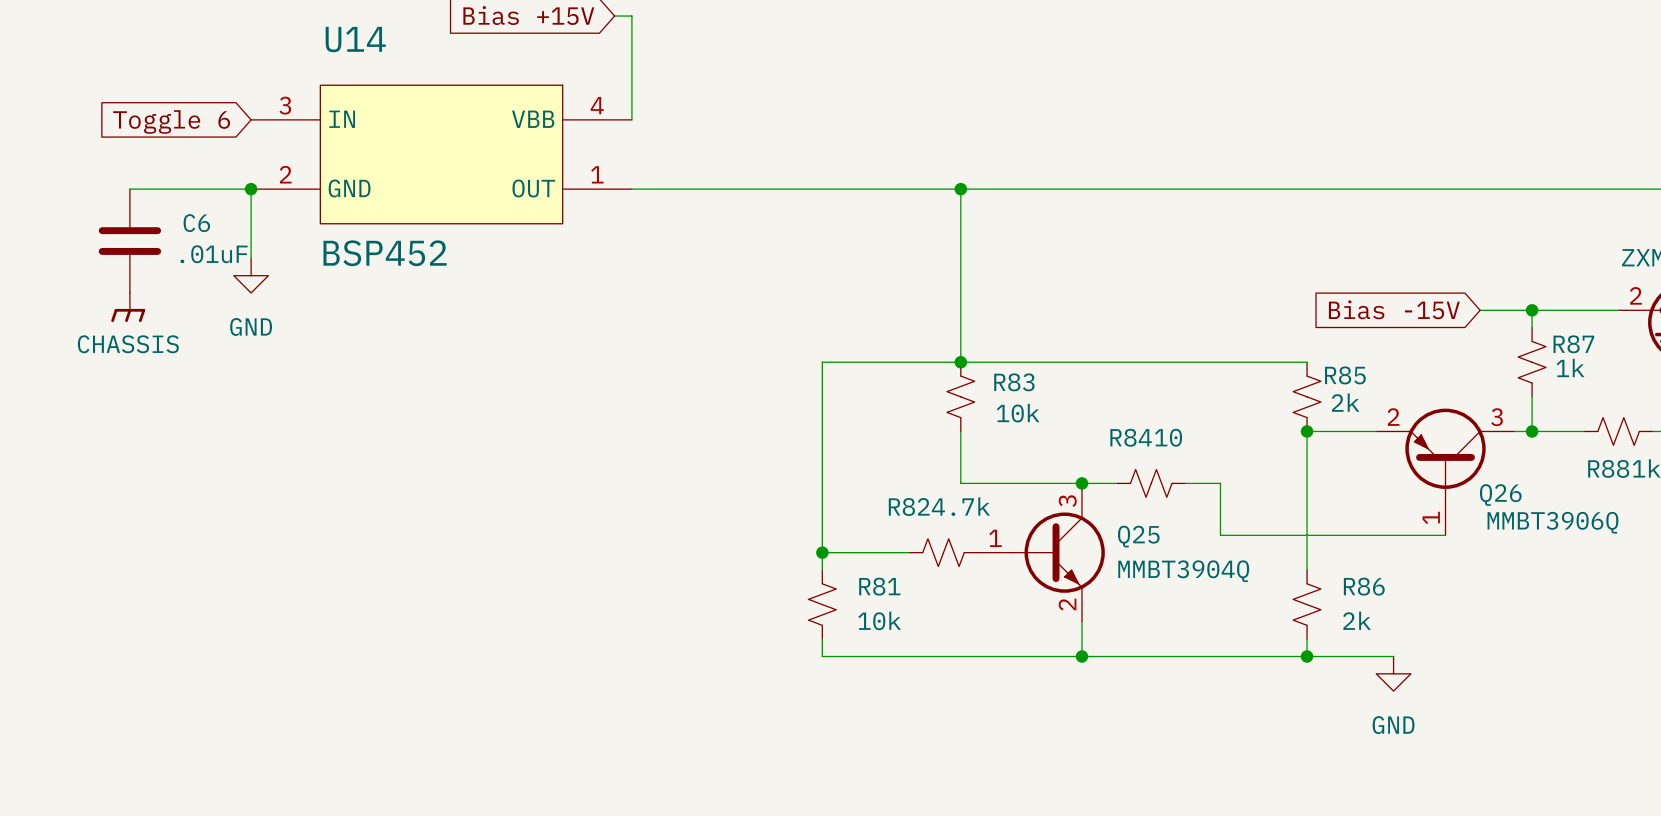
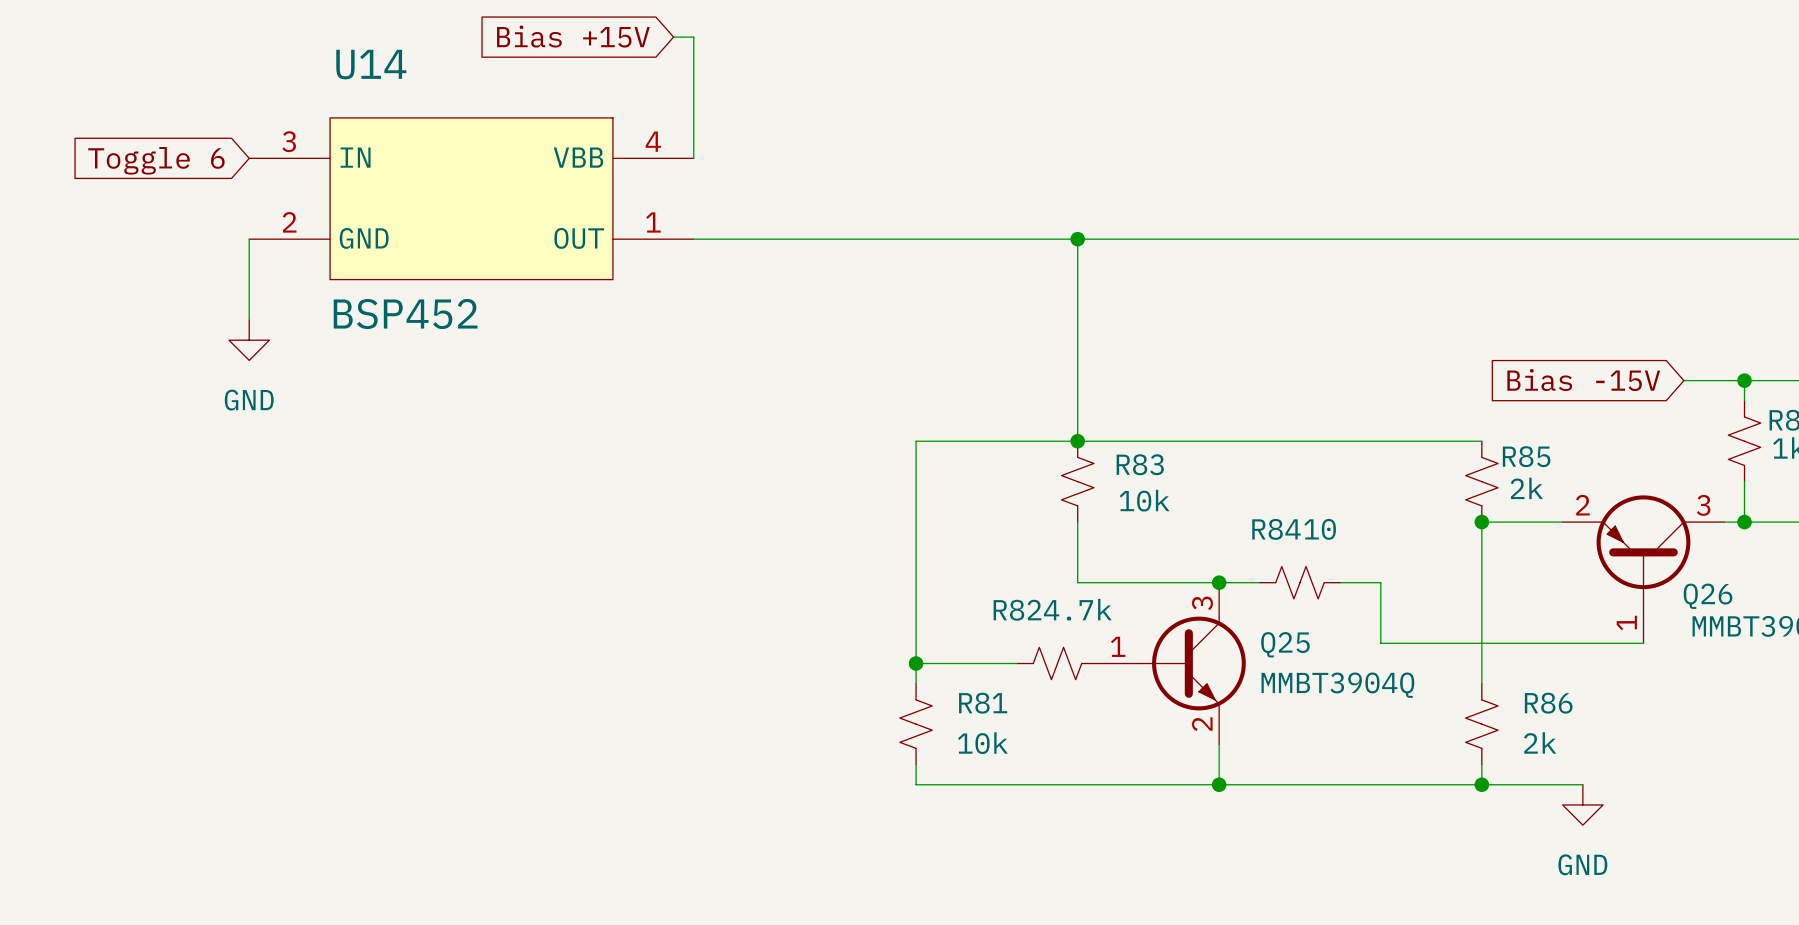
wire: (129, 189) (251, 189) -> none
junction: (251, 189) -> none
C6: .01uF (129, 241) -> none
power symbol: CHASSIS (128, 307) -> none

